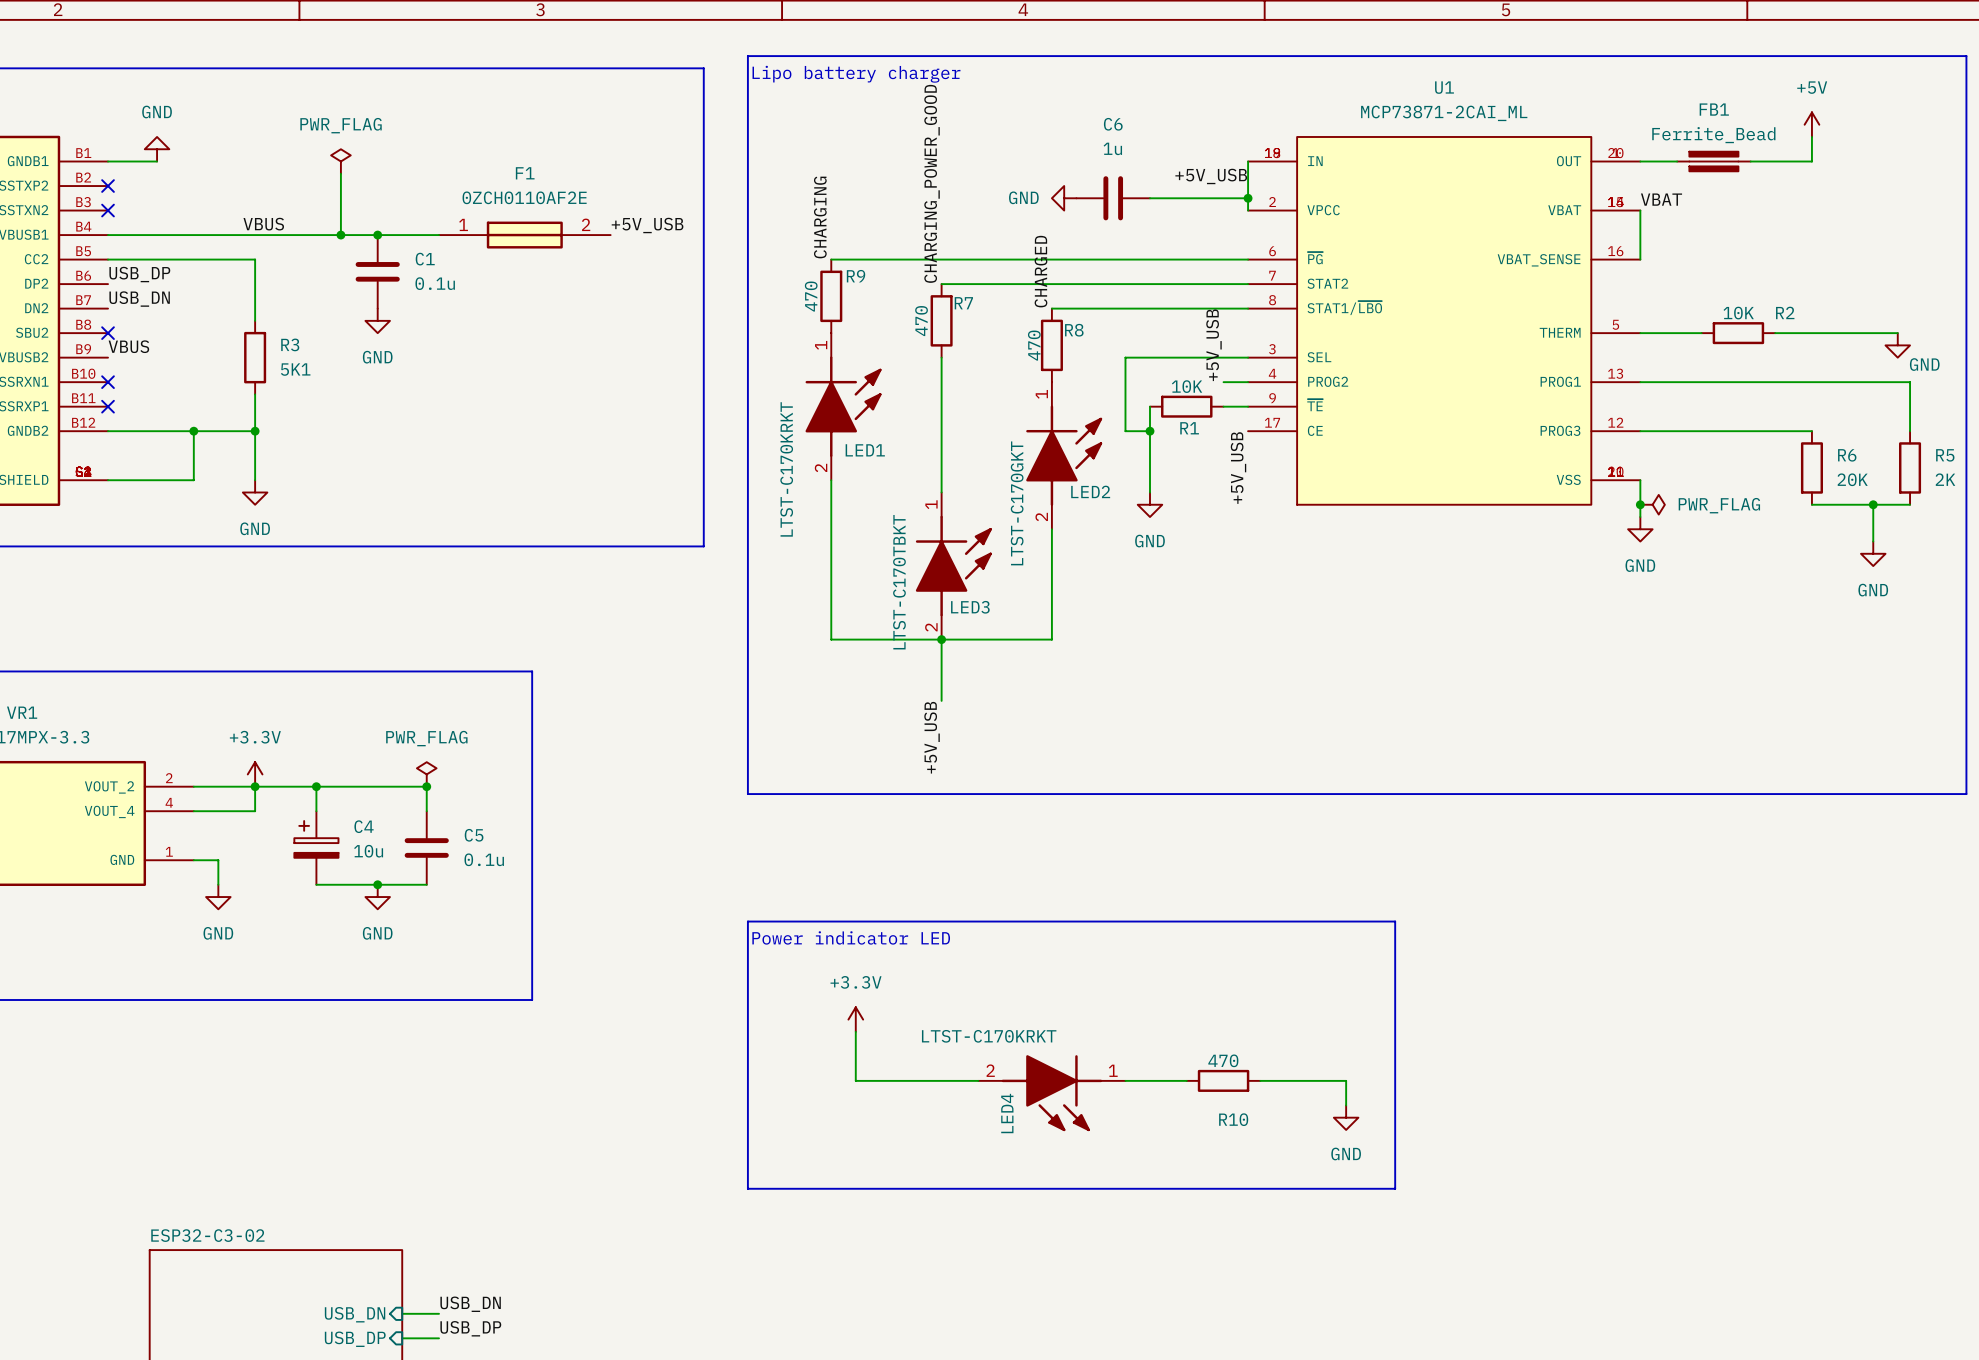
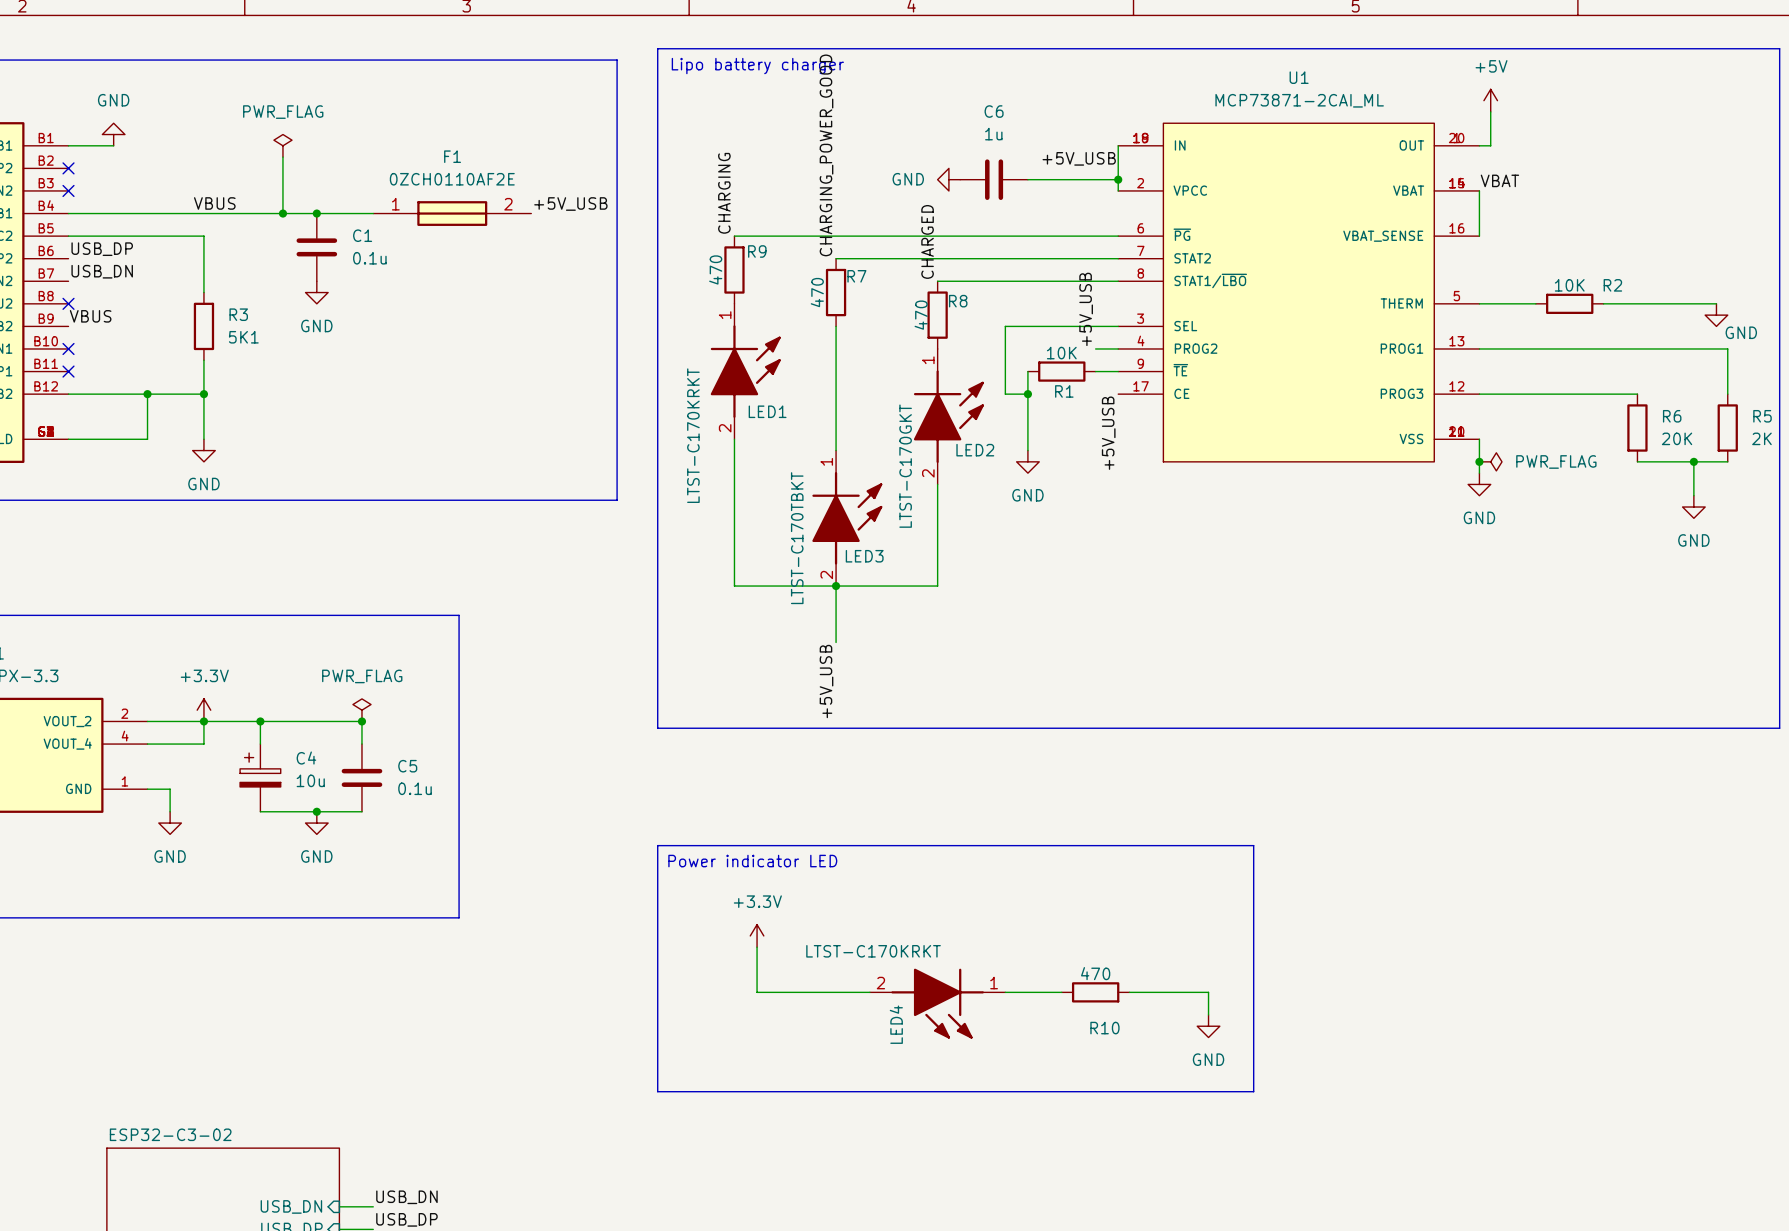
power symbol position: +5V (1811, 124) -> +5V (1490, 100)
wire: (1811, 136) (1811, 161) (1750, 161) -> none
wire: (1652, 161) (1677, 161) -> (1490, 145) (1490, 111)
FB1: Ferrite_Bead (1713, 161) -> none

